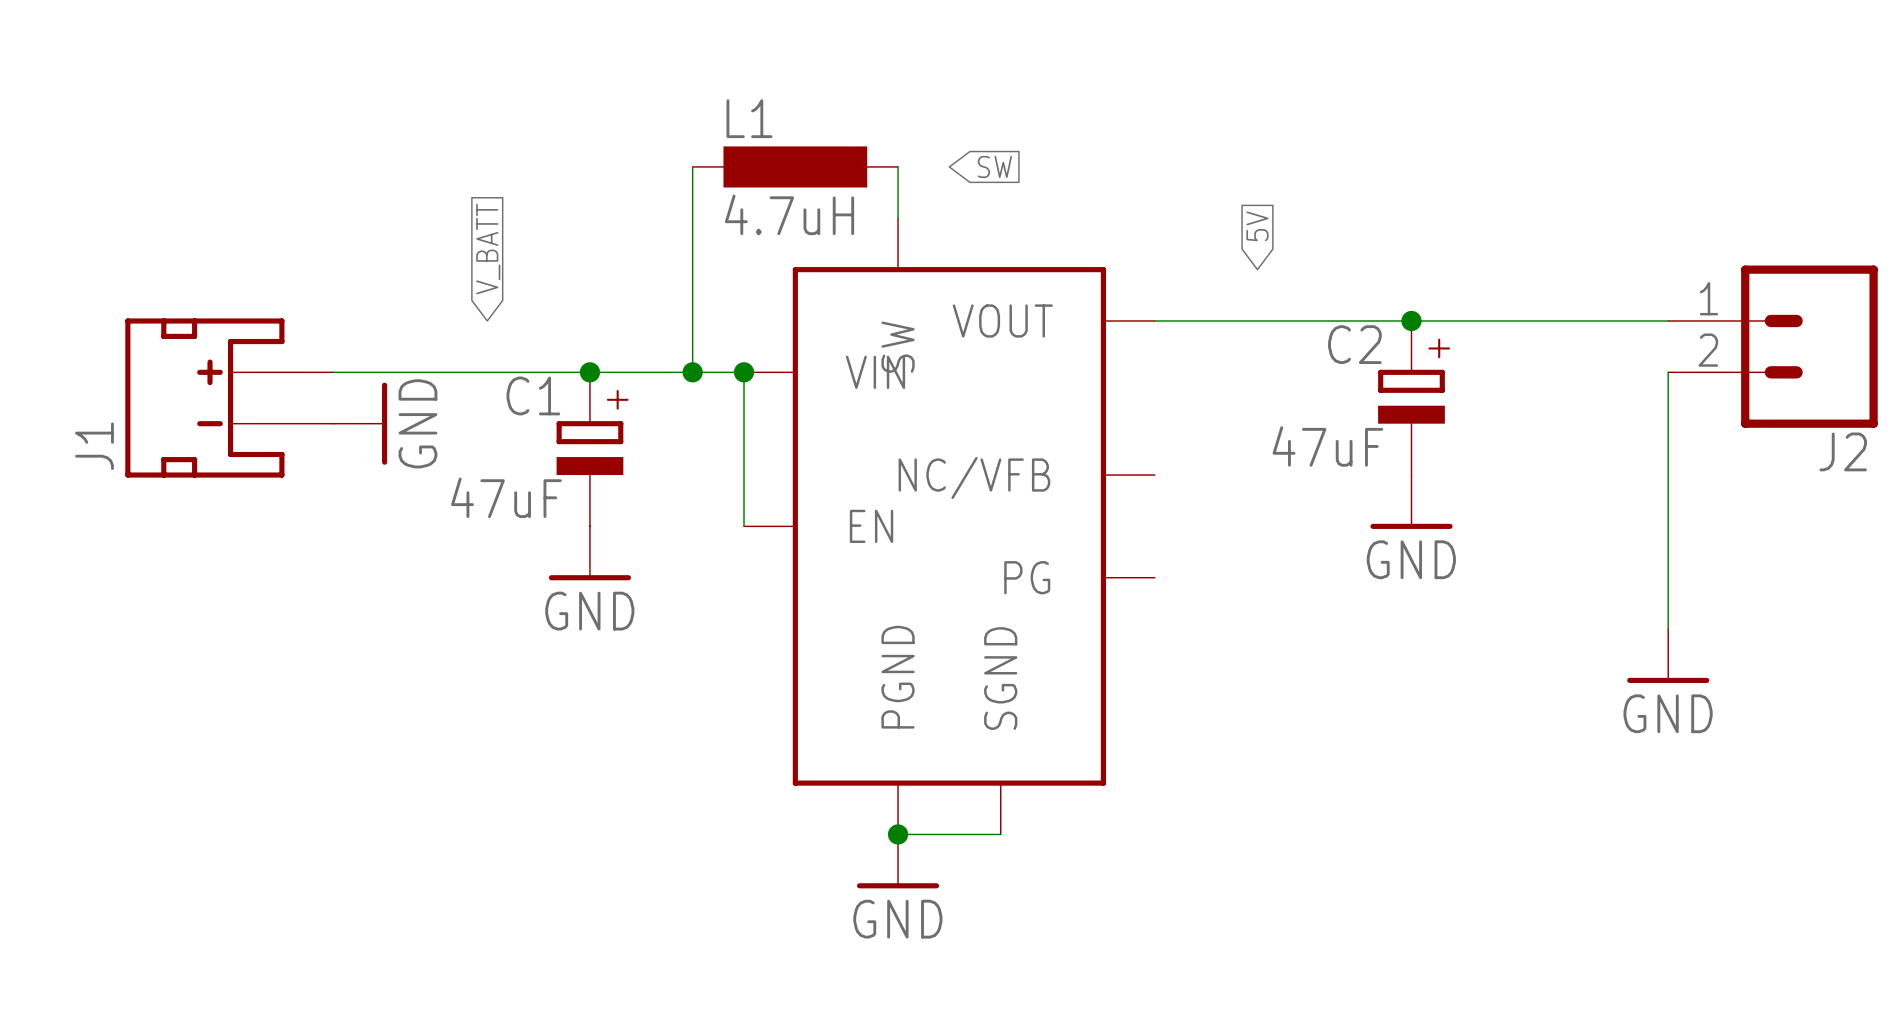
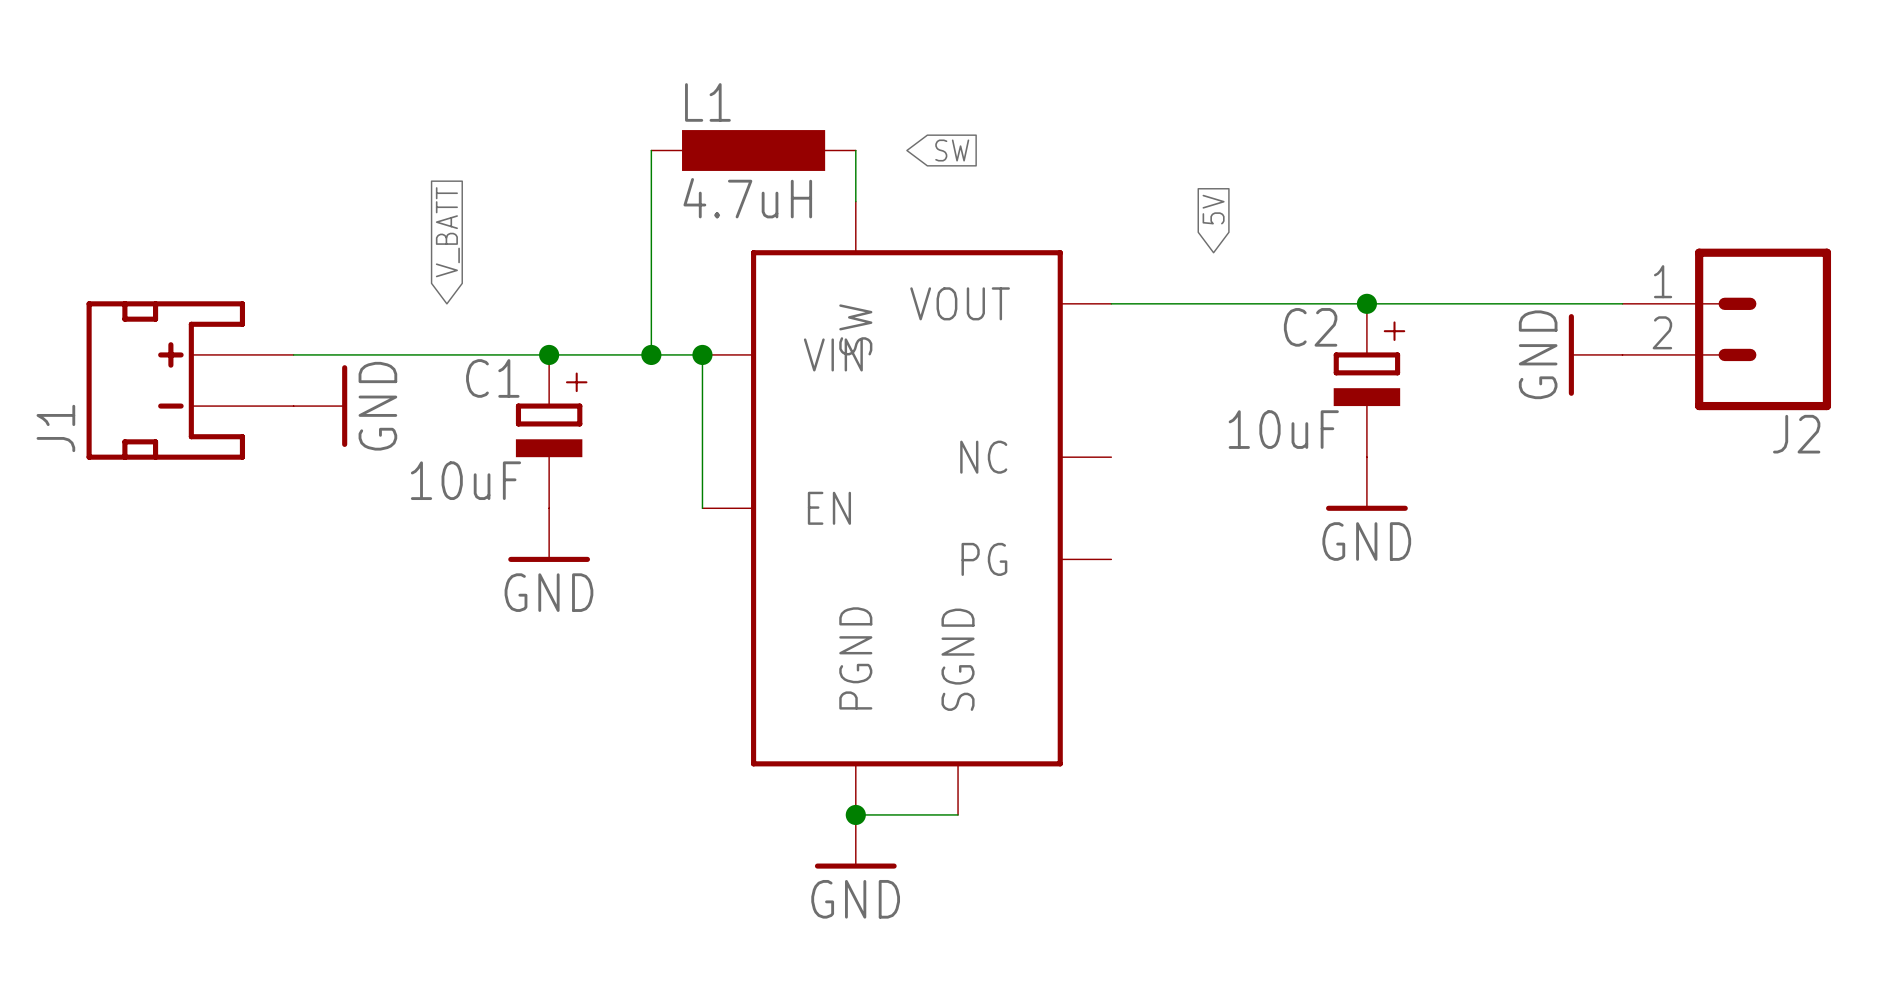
wire: (1668, 372) (1668, 629) -> none
C2 value: 47uF (1327, 446) -> 10uF (1283, 429)
part pin name: NC/VFB (974, 477) -> NC (983, 457)
C1 value: 47uF (506, 497) -> 10uF (465, 480)
power symbol position: GND (1668, 656) -> GND (1595, 354)
power symbol rotation: 0° (1668, 680) -> 90° clockwise (1571, 354)

